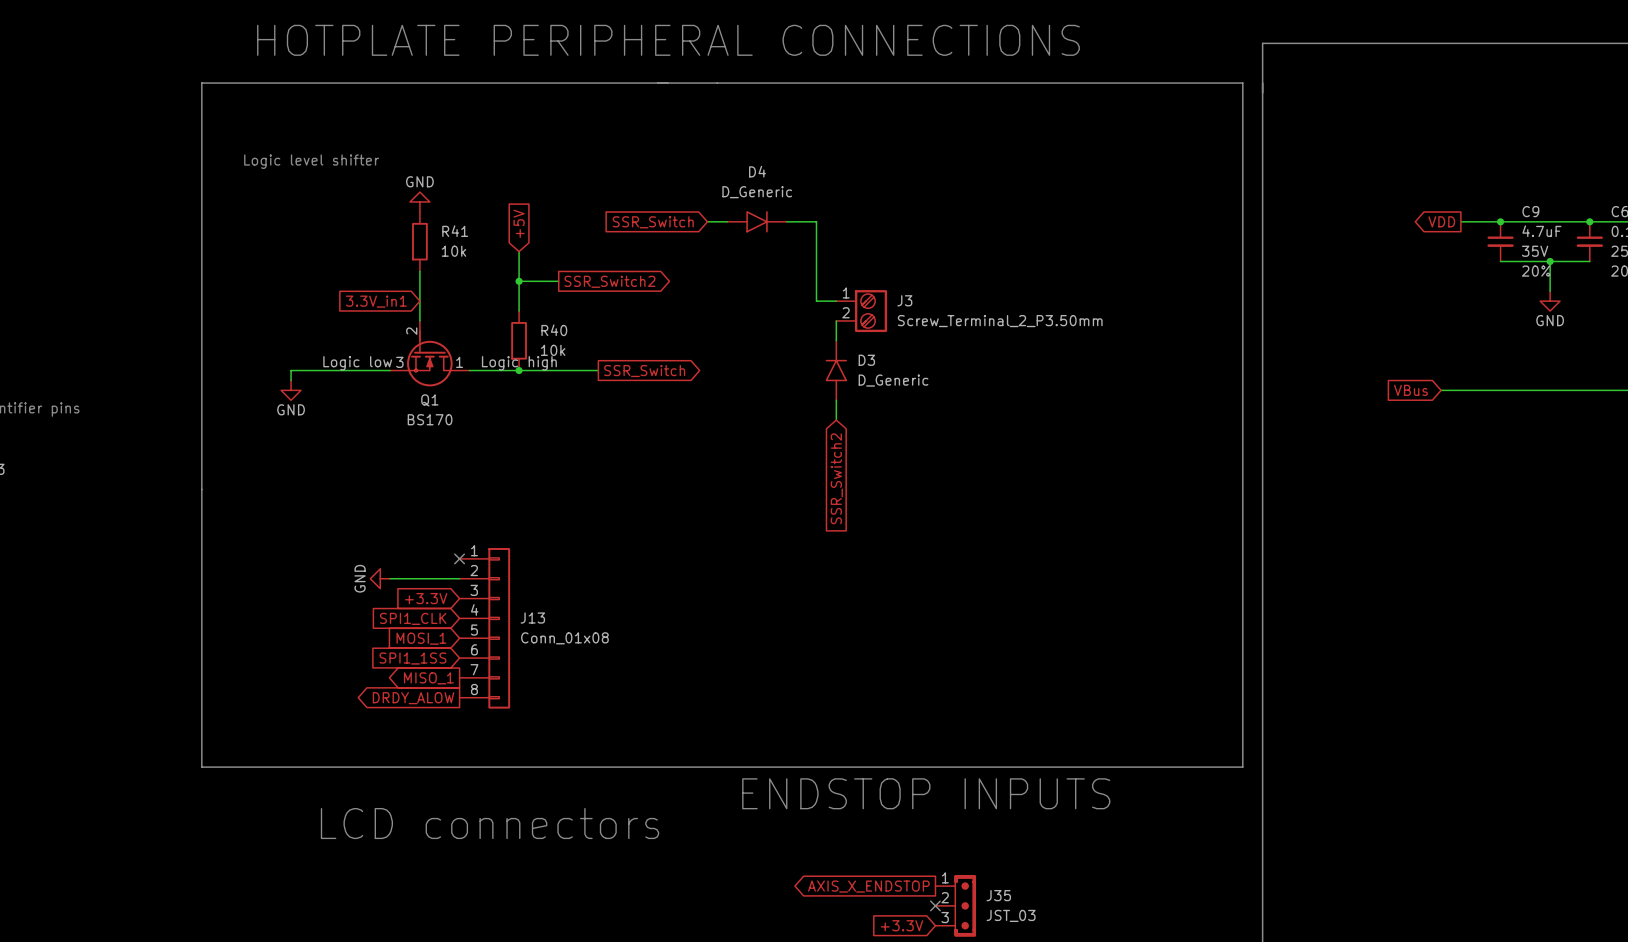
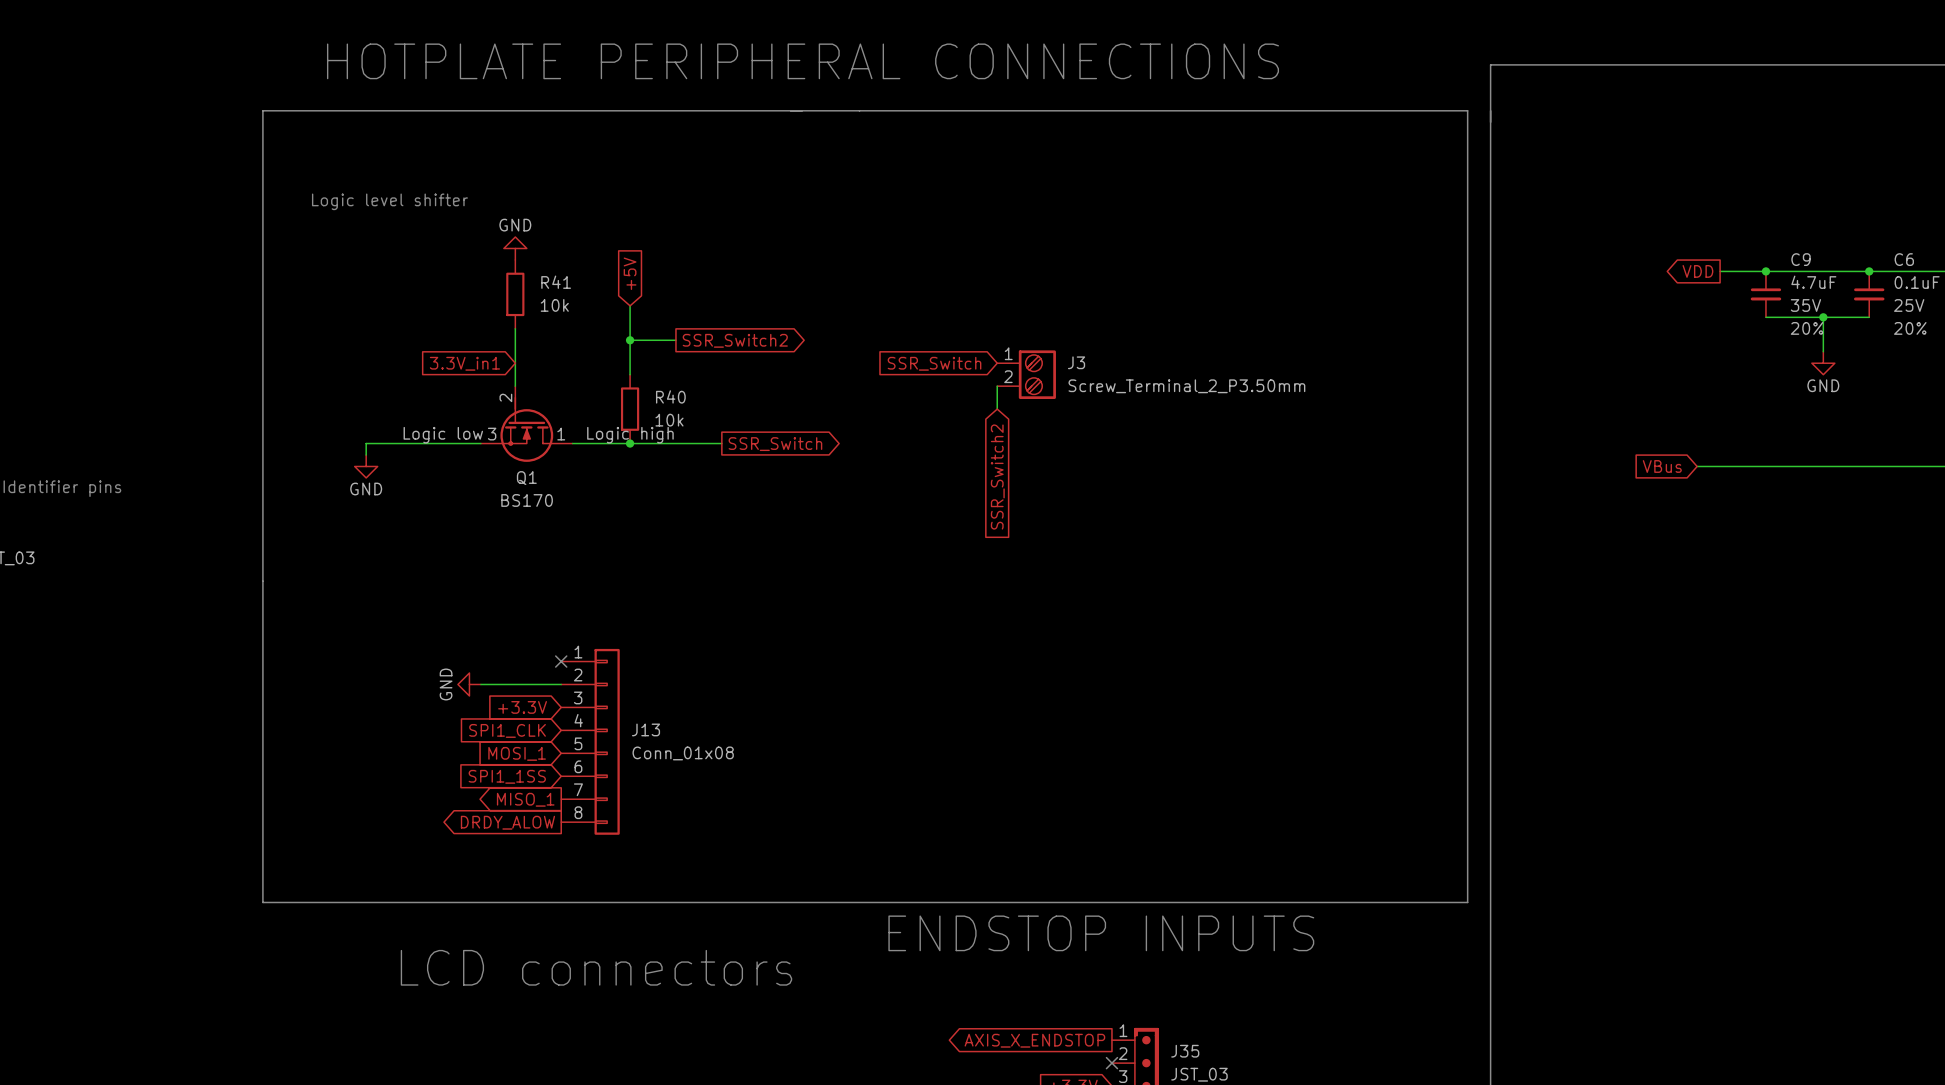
wire: (707, 221) (727, 221) -> none
D4: D_Generic (757, 221) -> none
wire: (786, 221) (816, 221) (816, 301) (836, 301) -> none
global label position: SSR_Switch (653, 222) -> SSR_Switch (934, 363)
D3: D_Generic (836, 370) -> none
wire: (836, 400) (836, 420) -> none
global label position: SSR_Switch2 (836, 478) -> SSR_Switch2 (997, 477)

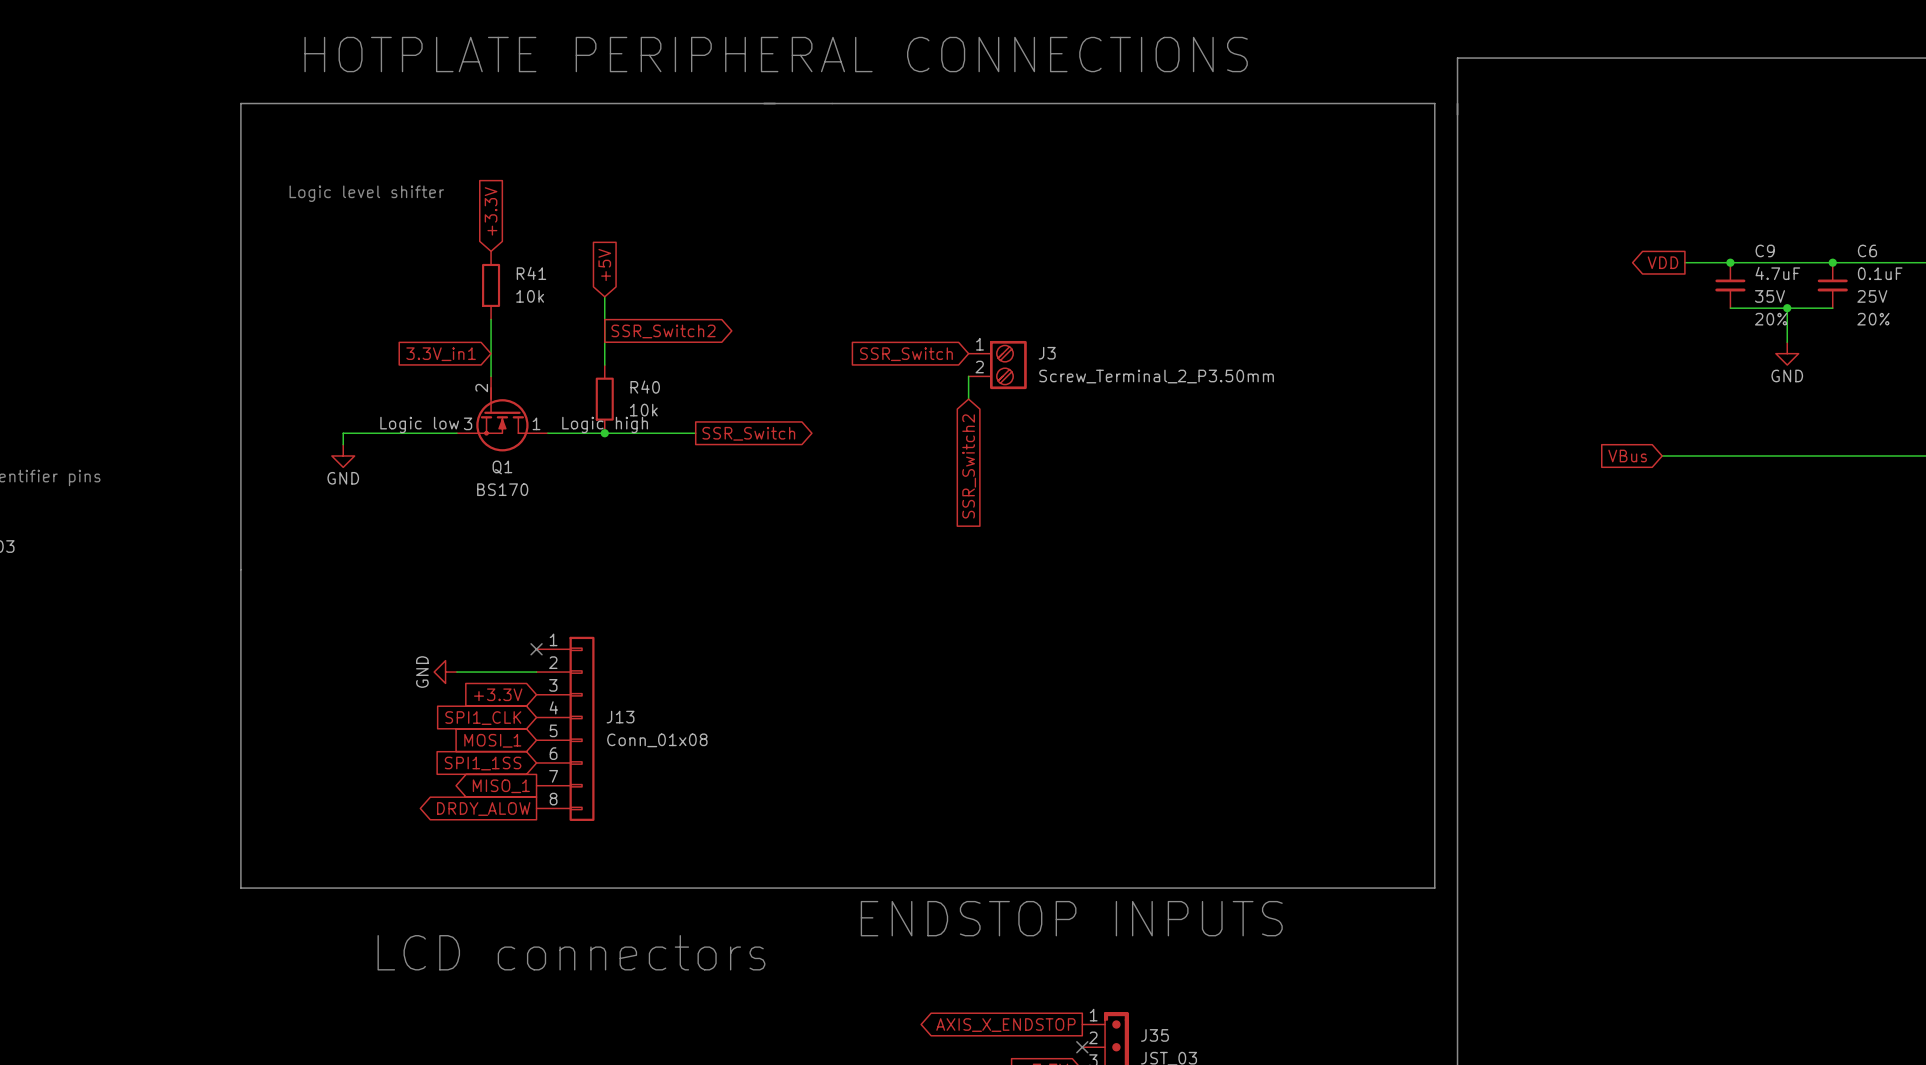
global label: none -> +3.3V (491, 211)
power symbol: GND (515, 248) -> none
wire: (630, 340) (675, 340) -> none
junction: (630, 340) -> none
global label position: SSR_Switch2 (735, 340) -> SSR_Switch2 (663, 331)

